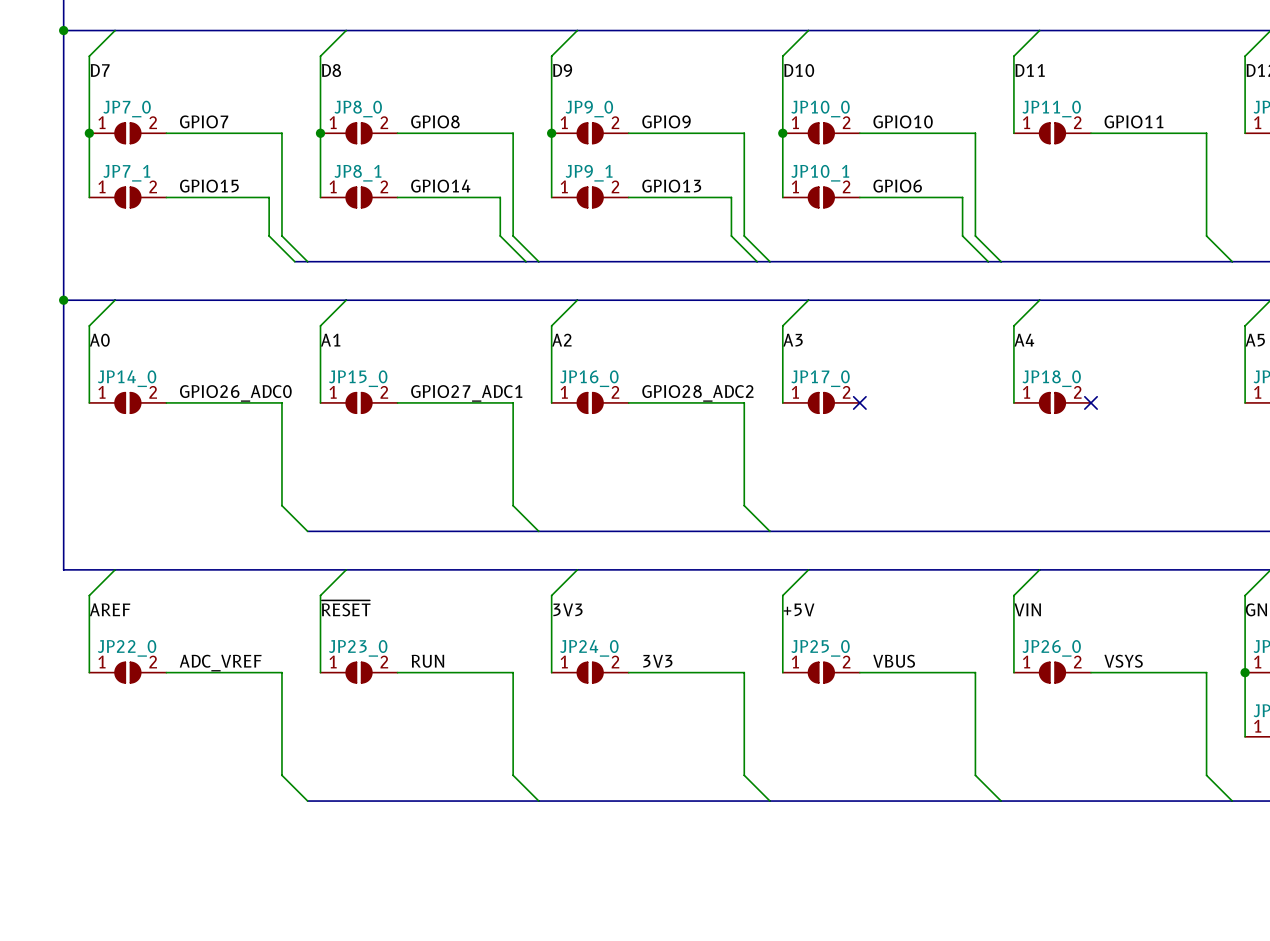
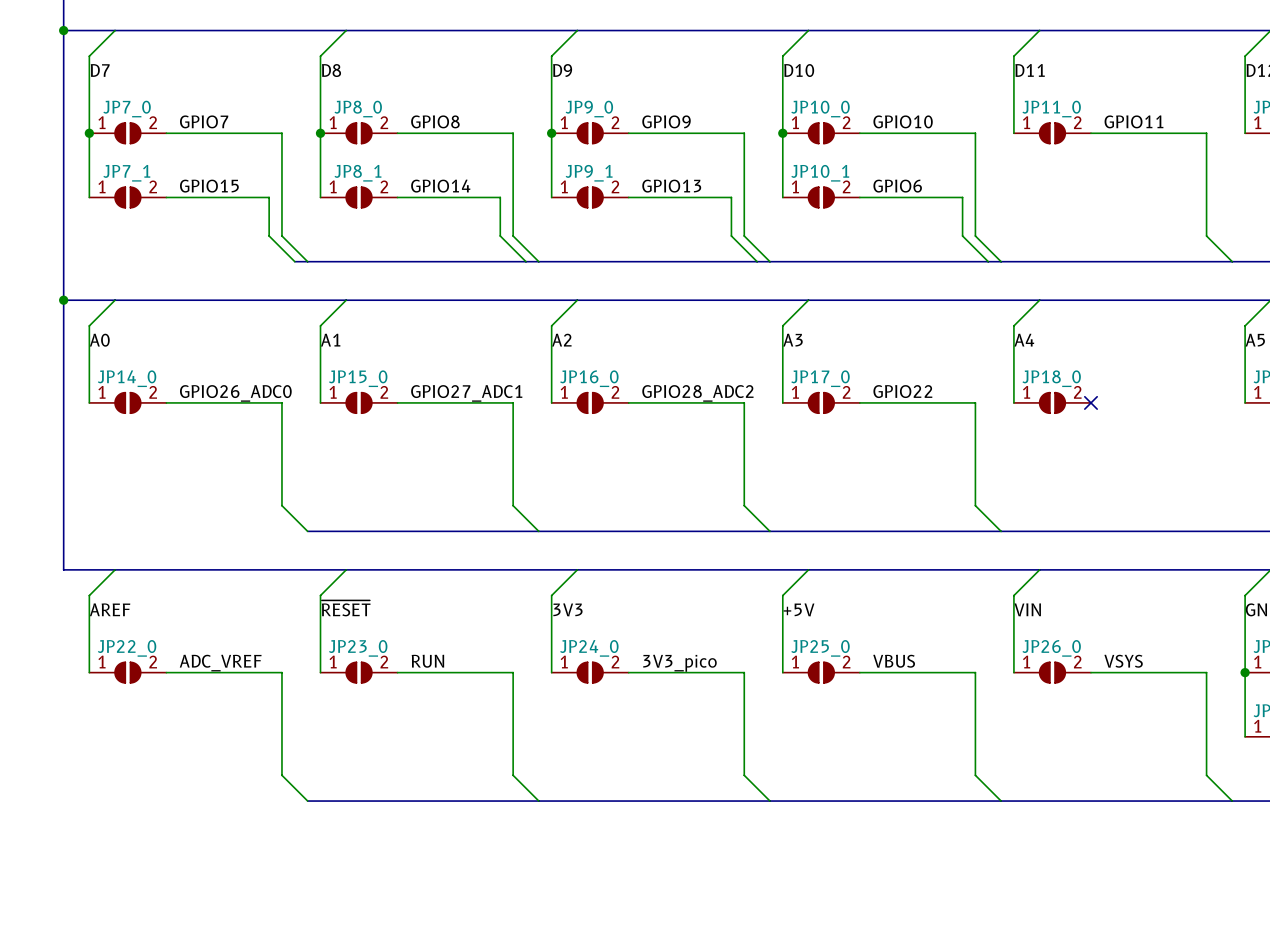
label: none -> GPIO22 (902, 391)
wire: none -> (859, 402) (975, 402) (975, 505) (1001, 531)
no-connect mark: (859, 402) -> none
label: 3V3 (657, 661) -> 3V3_pico (679, 663)

